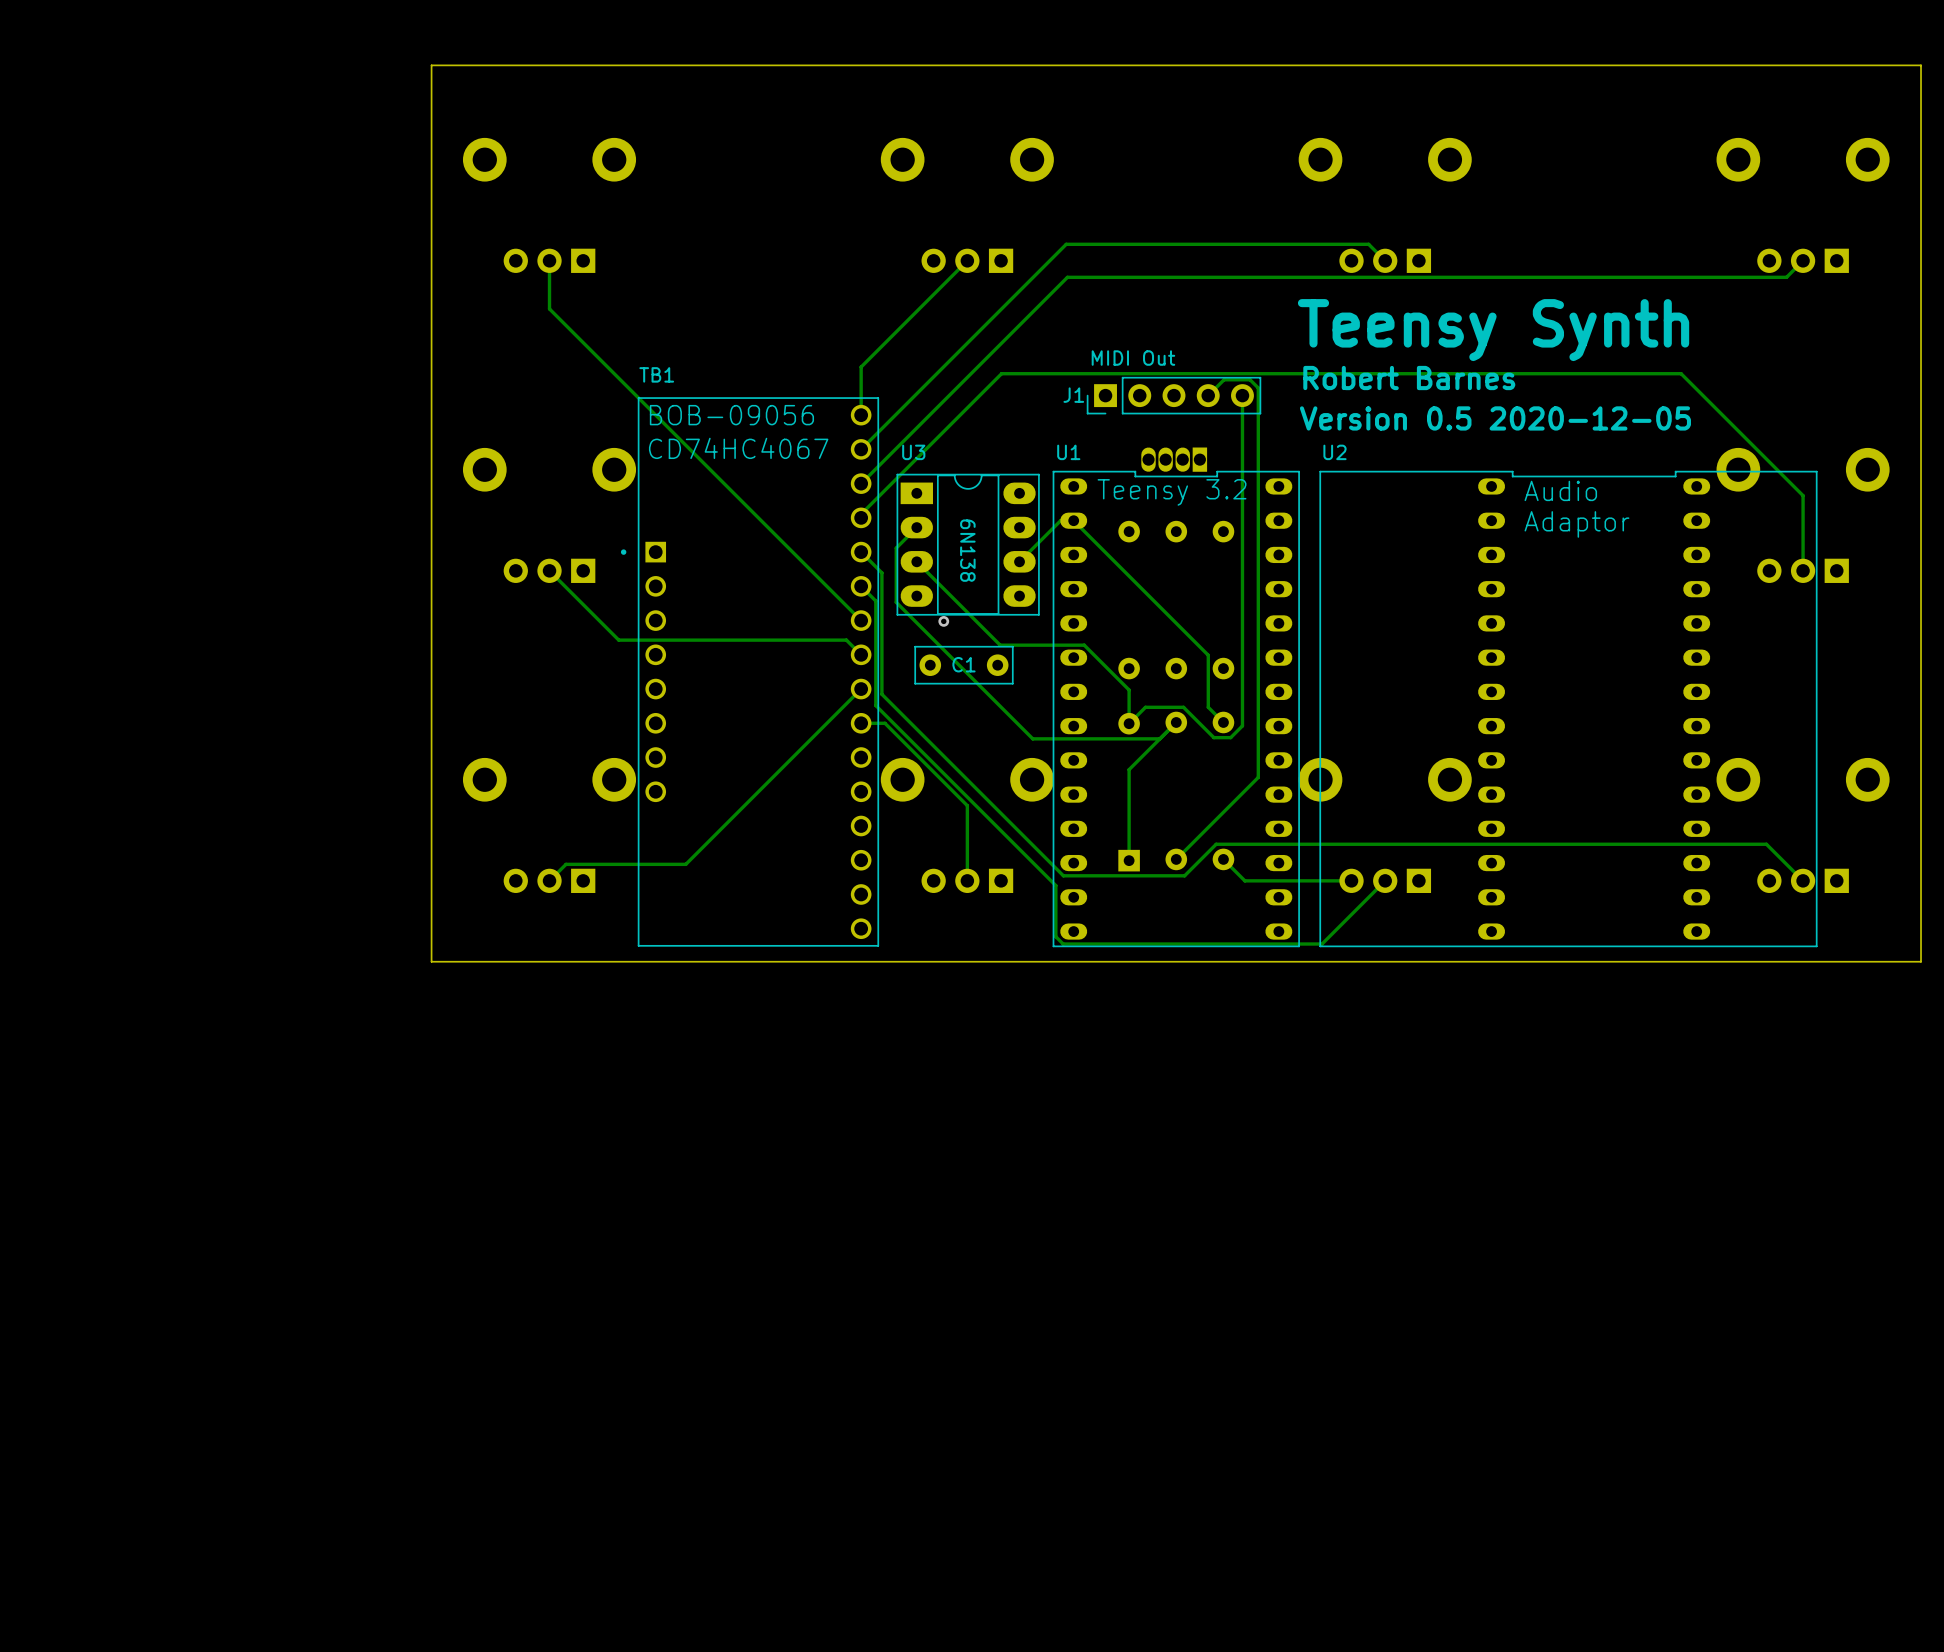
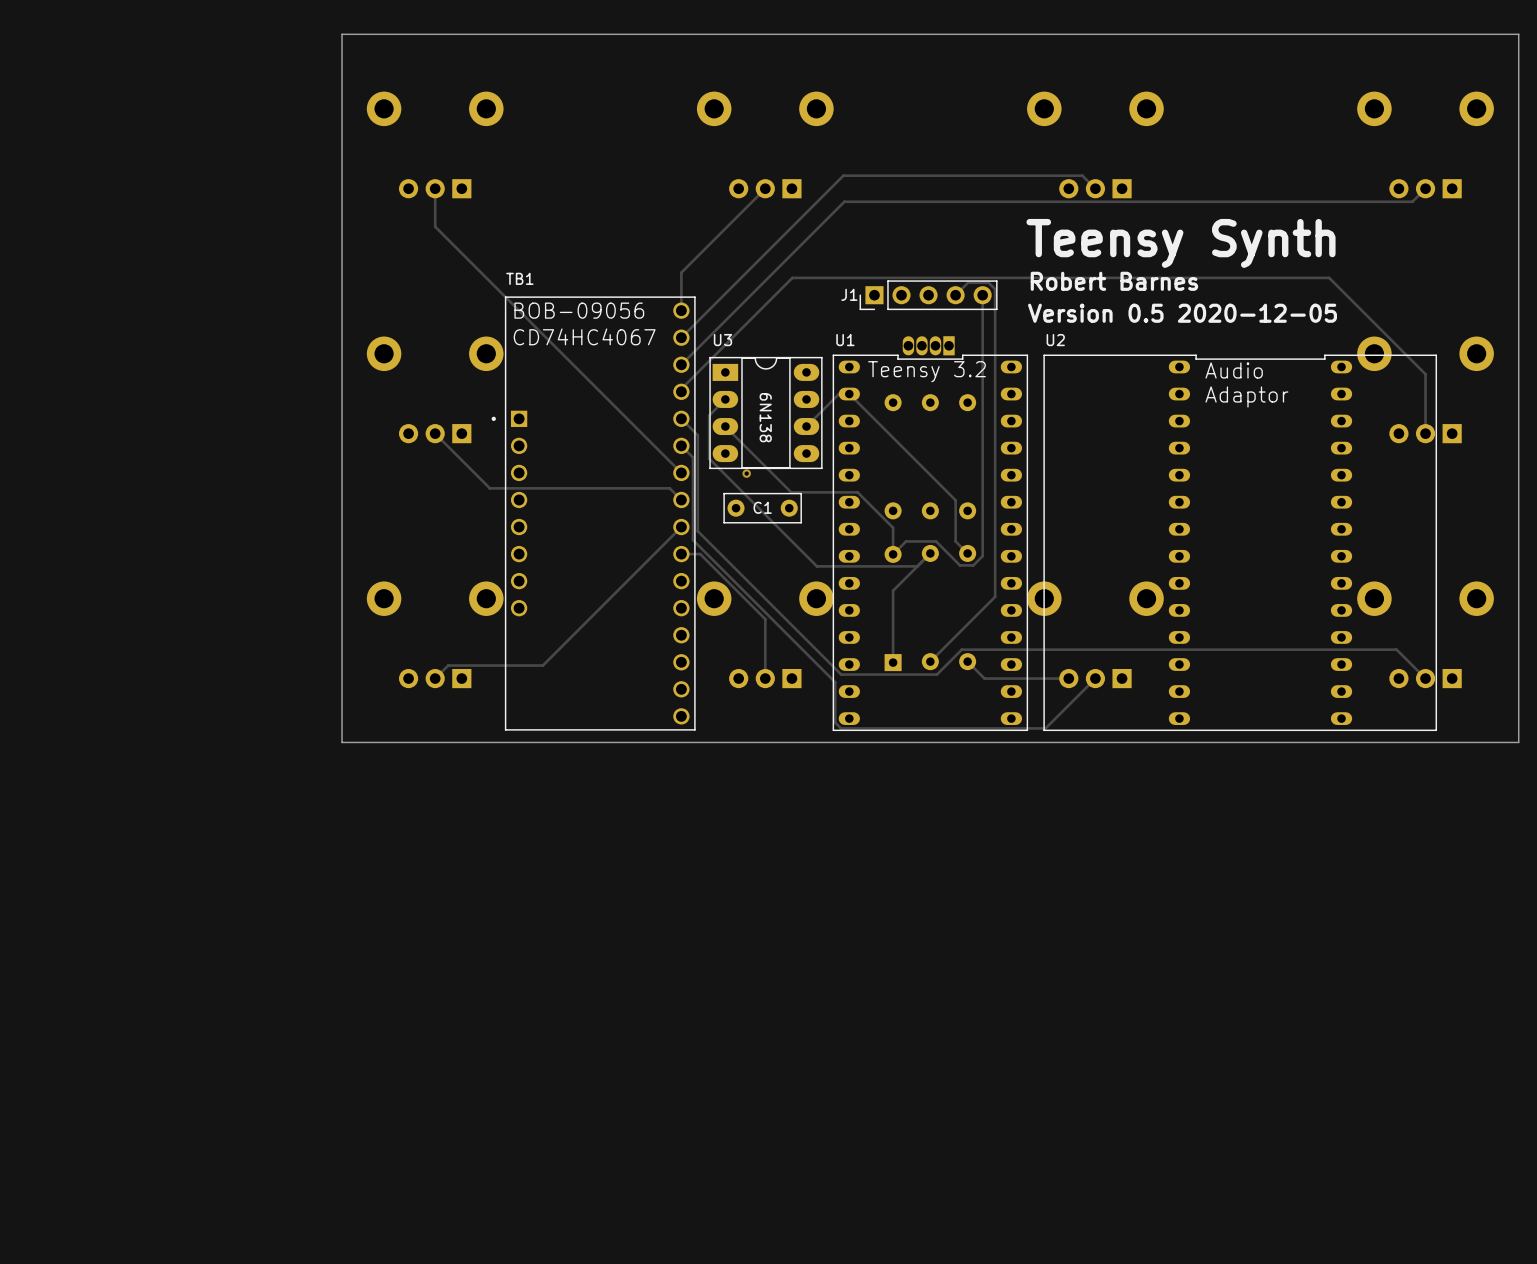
text: MIDI Out (1133, 358) -> none

